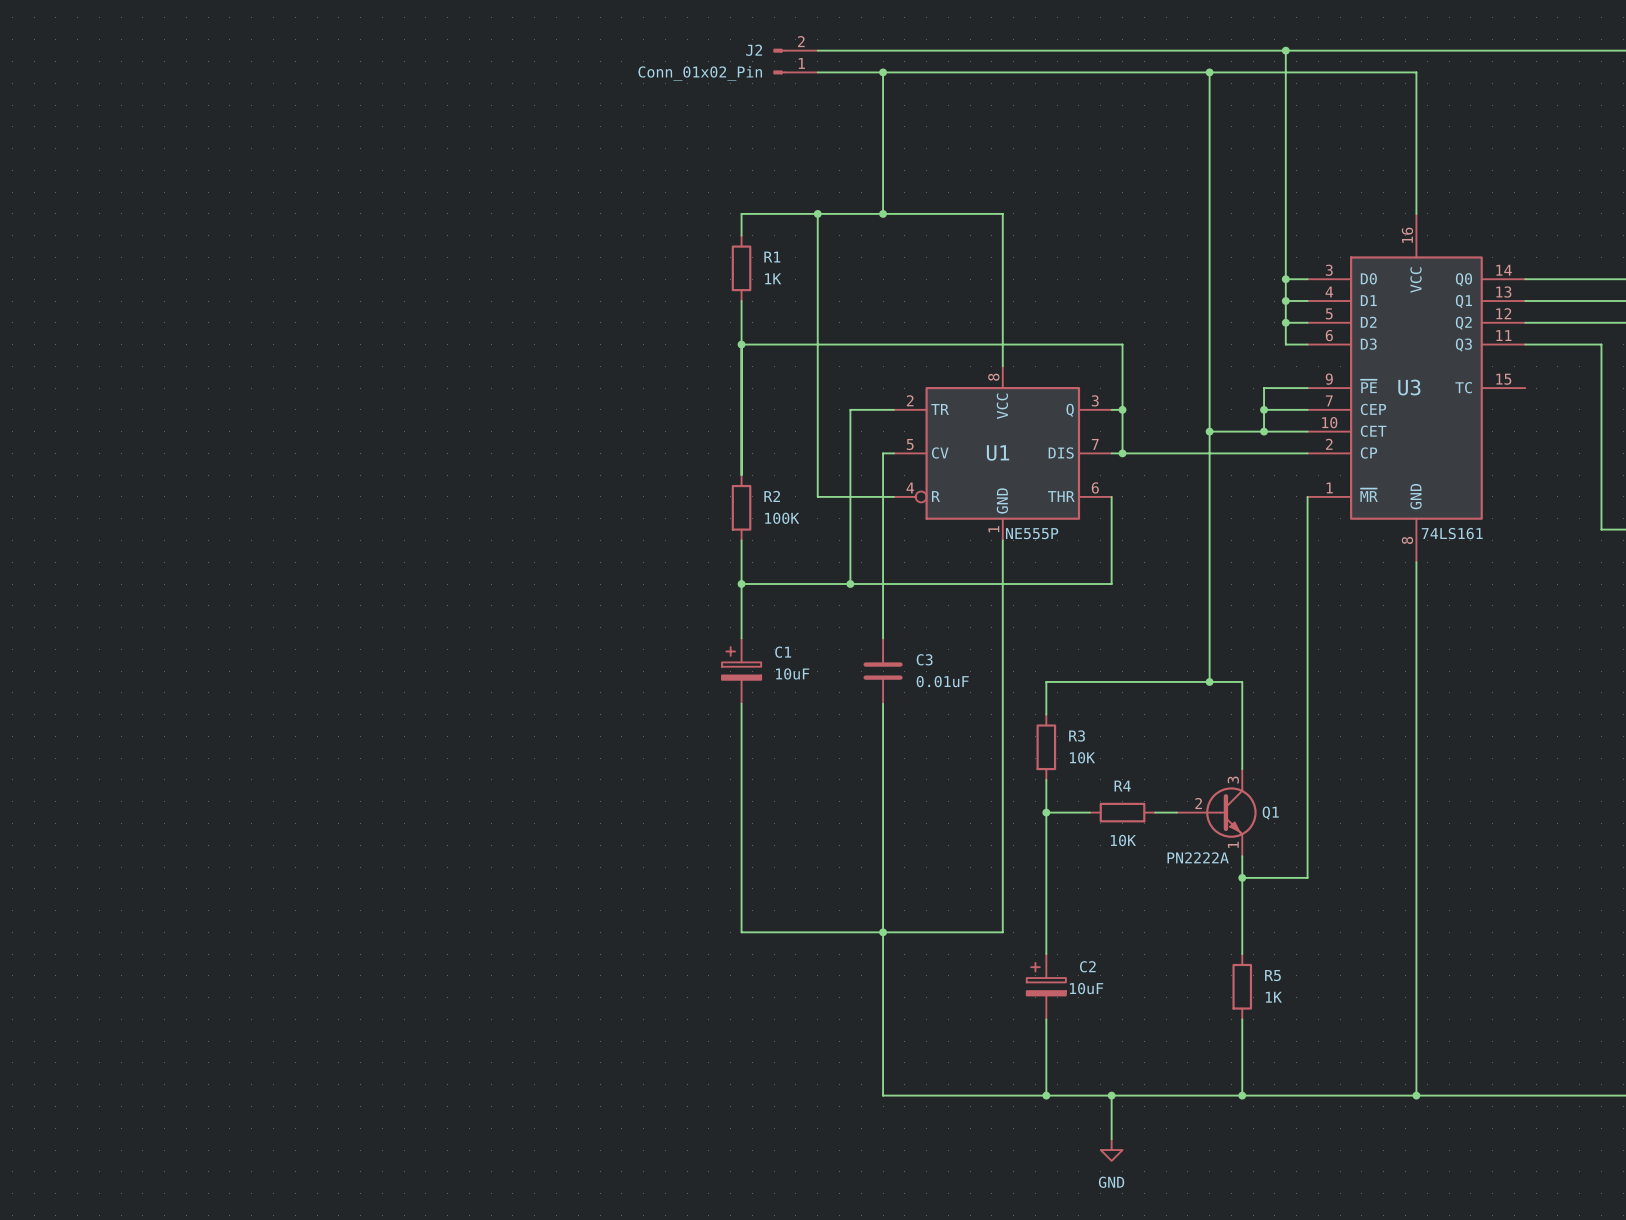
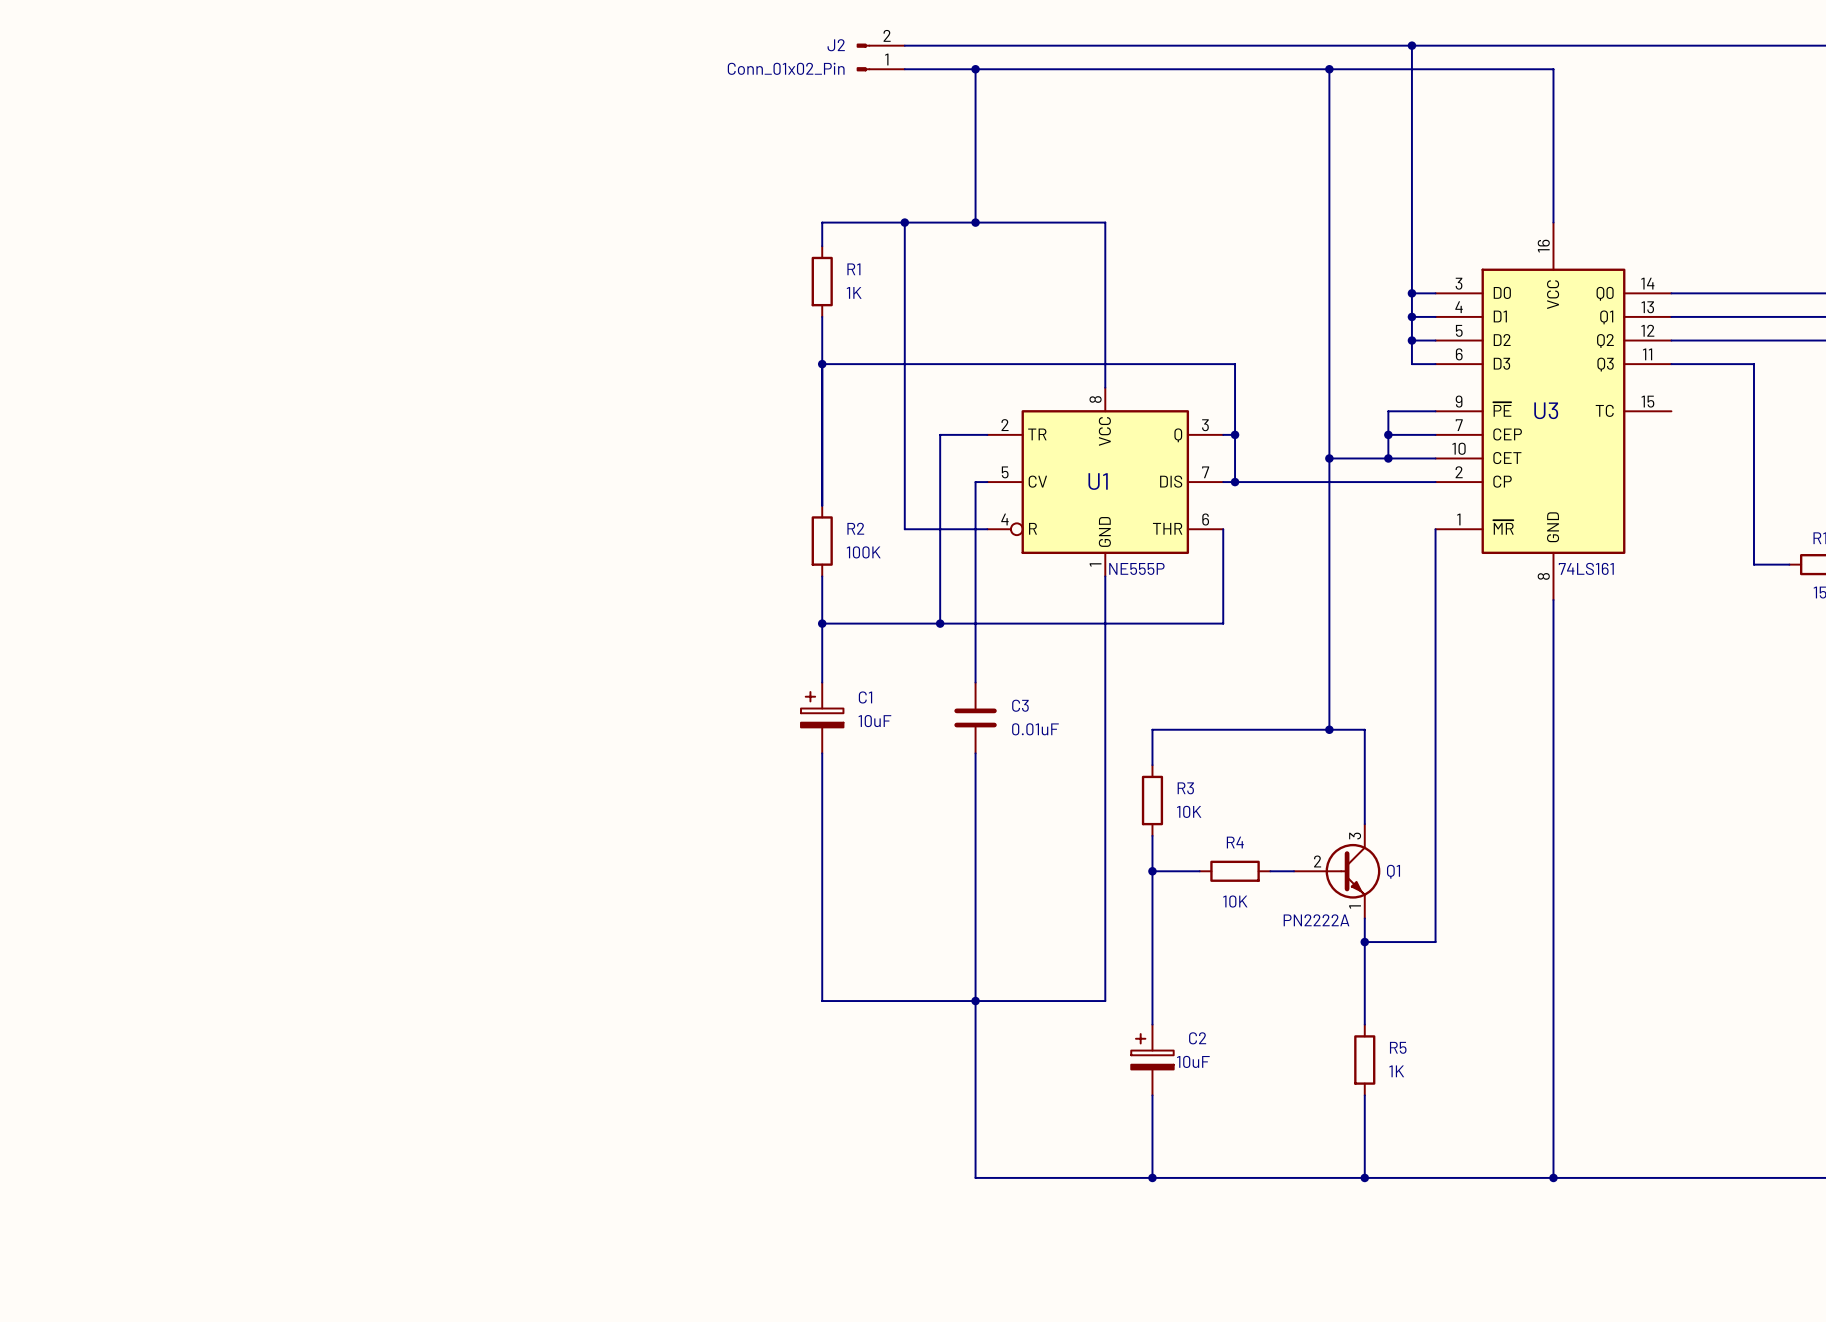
wire: (1111, 1095) (1111, 1139) -> none
junction: (1111, 1095) -> none
power symbol: GND (1111, 1150) -> none

